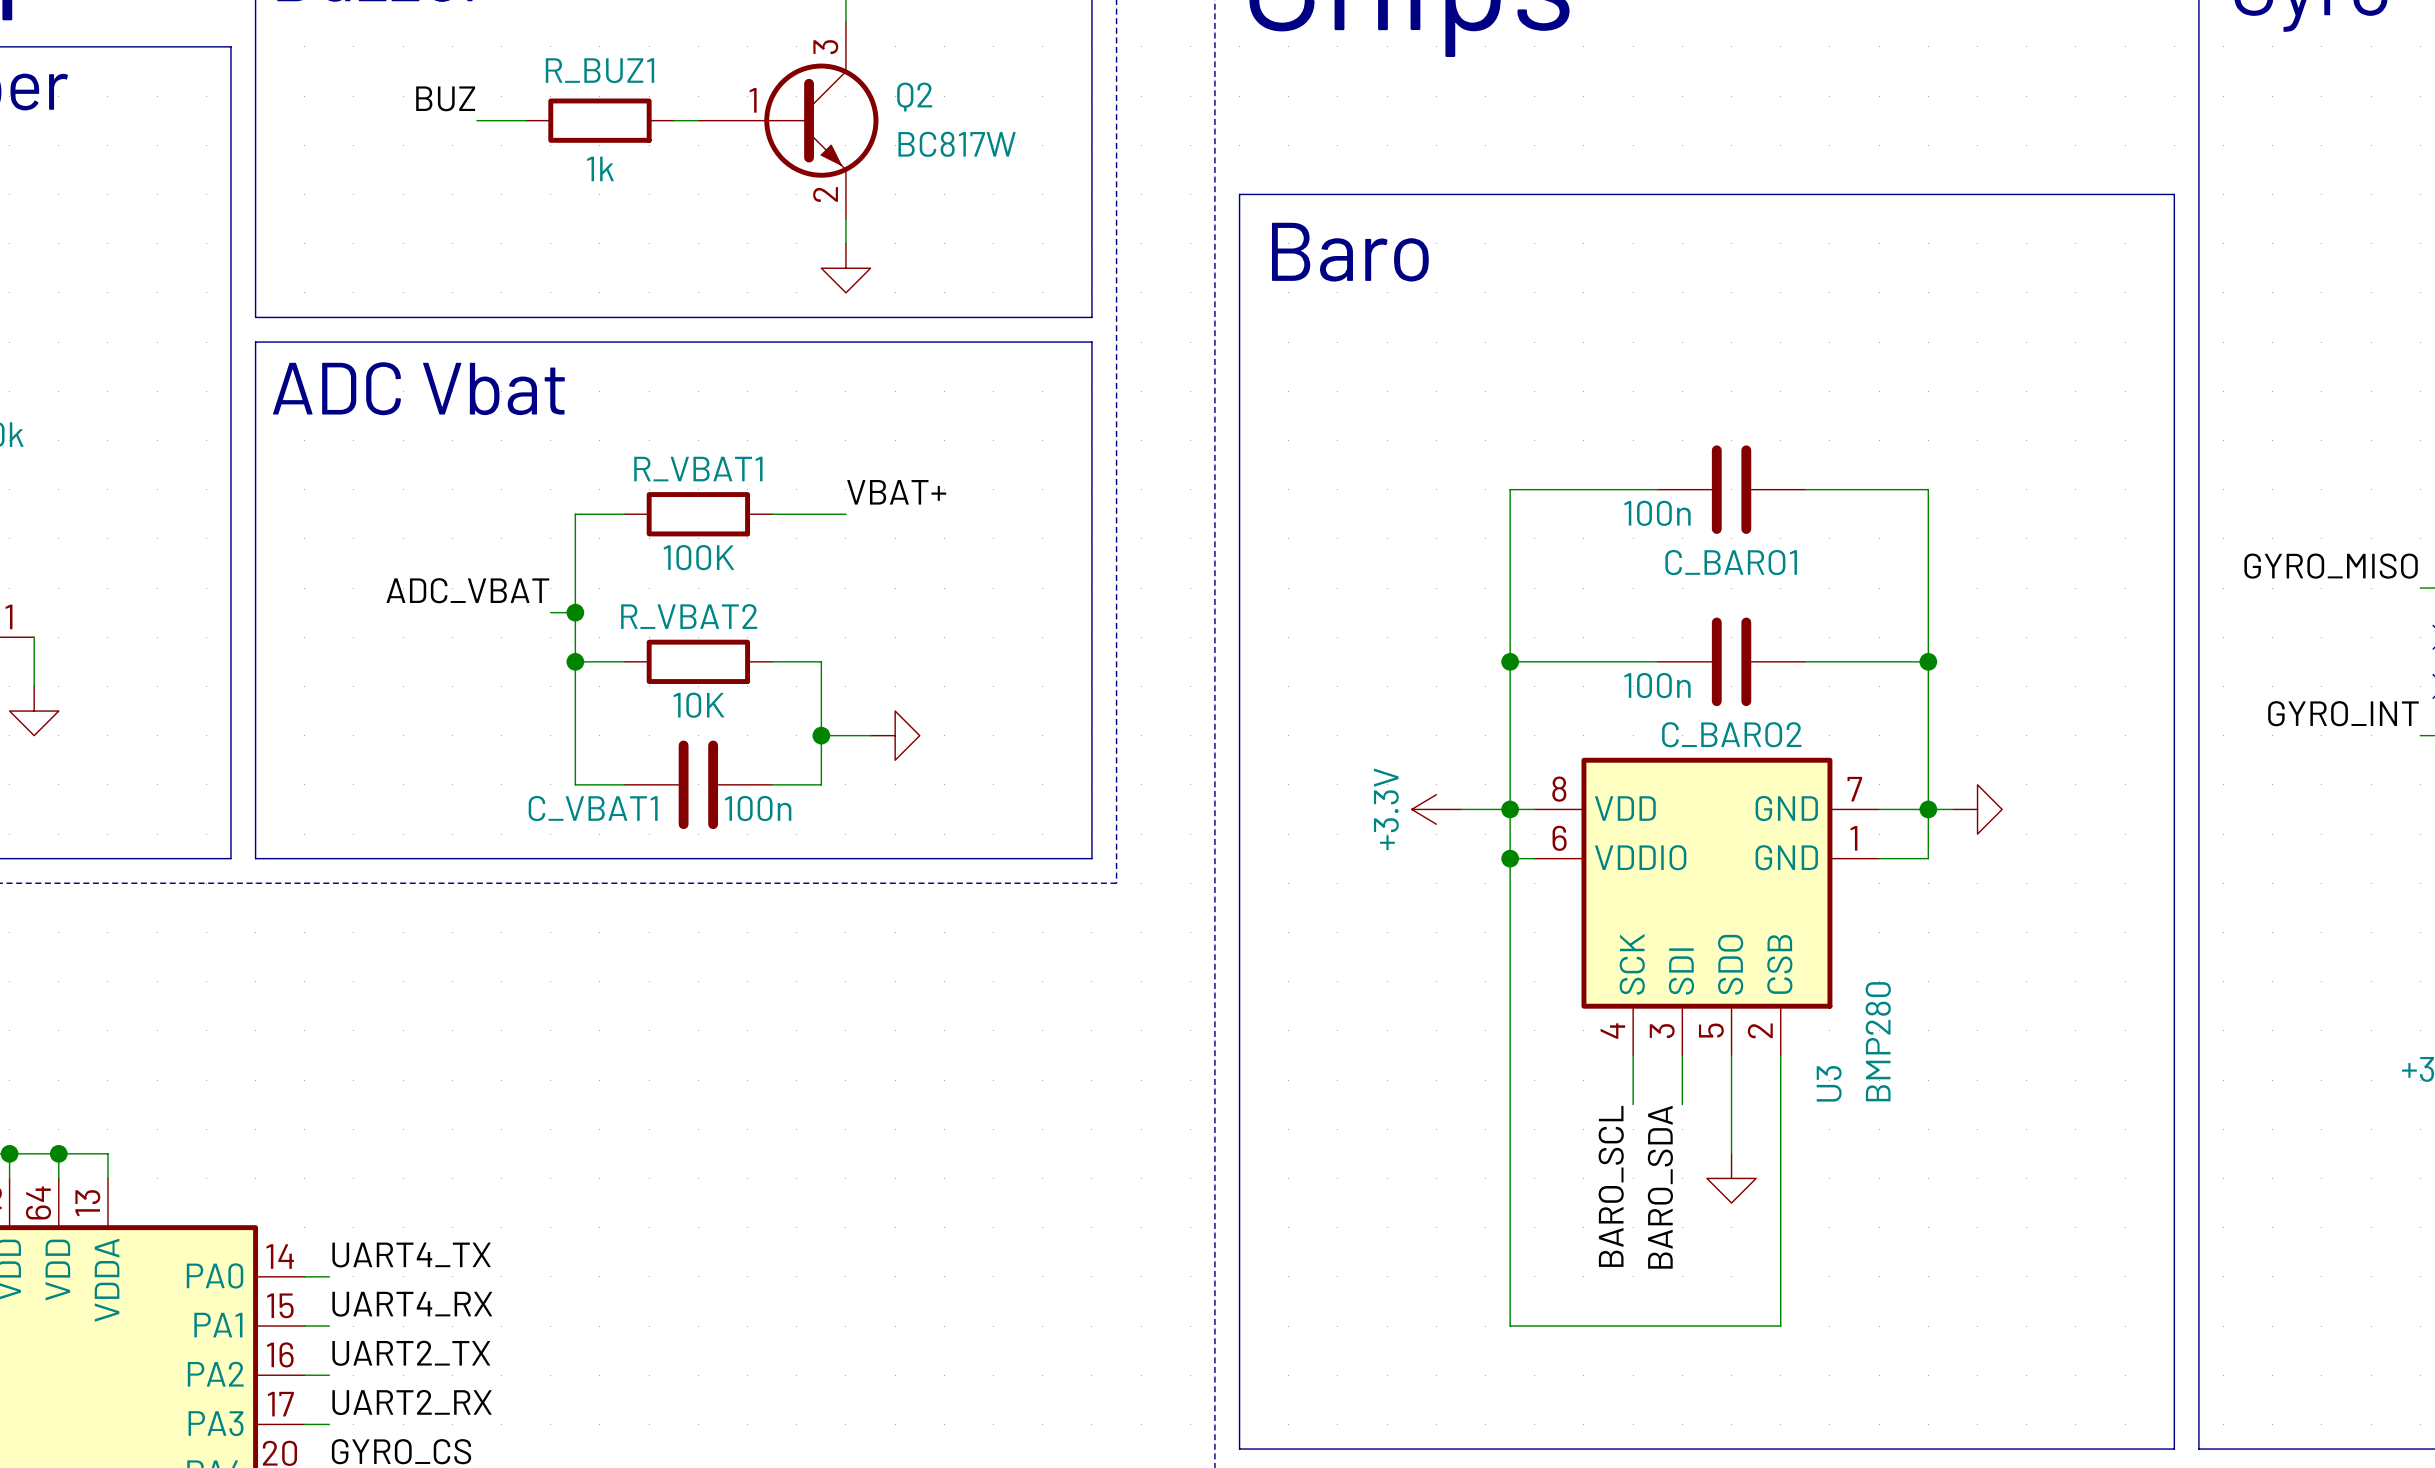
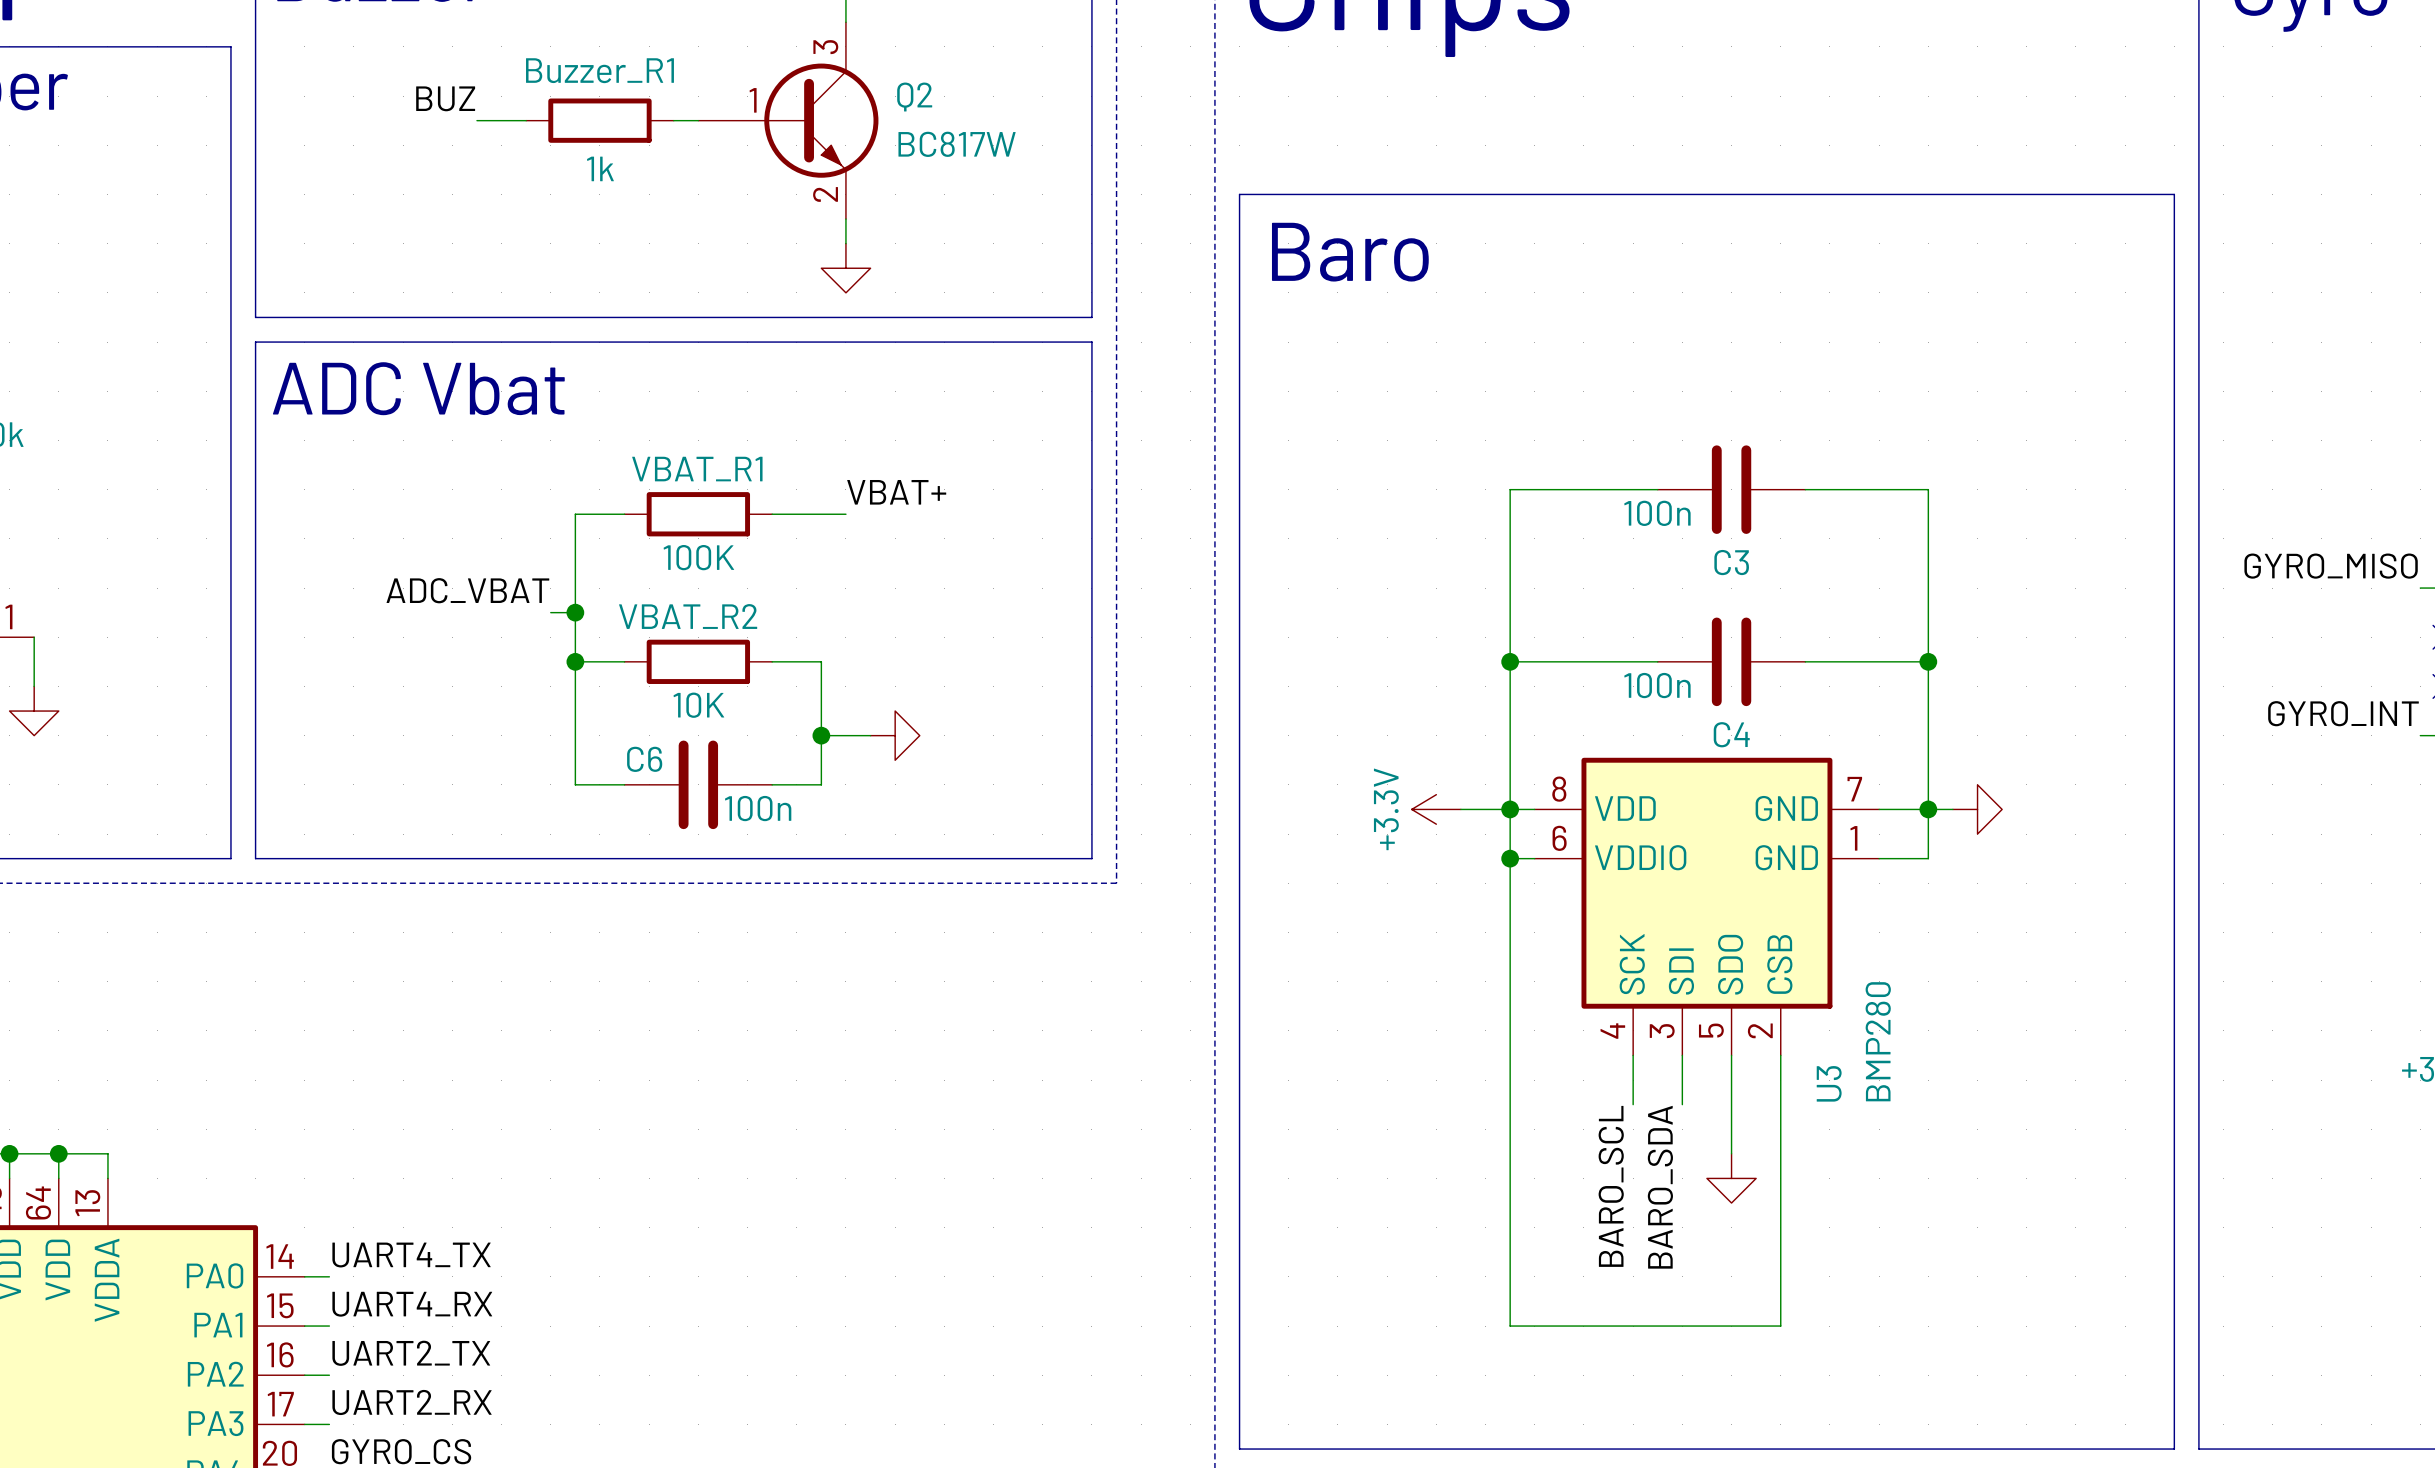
R_BUZ1 name: R_BUZ1 (599, 70) -> Buzzer_R1 (599, 70)
R_VBAT1 name: R_VBAT1 (698, 469) -> VBAT_R1 (697, 469)
C_BARO1 name: C_BARO1 (1731, 562) -> C3 (1731, 562)
R_VBAT2 name: R_VBAT2 (689, 616) -> VBAT_R2 (688, 616)
C_BARO2 name: C_BARO2 (1731, 734) -> C4 (1731, 734)
C_VBAT1 name: C_VBAT1 (593, 808) -> C6 (644, 759)

